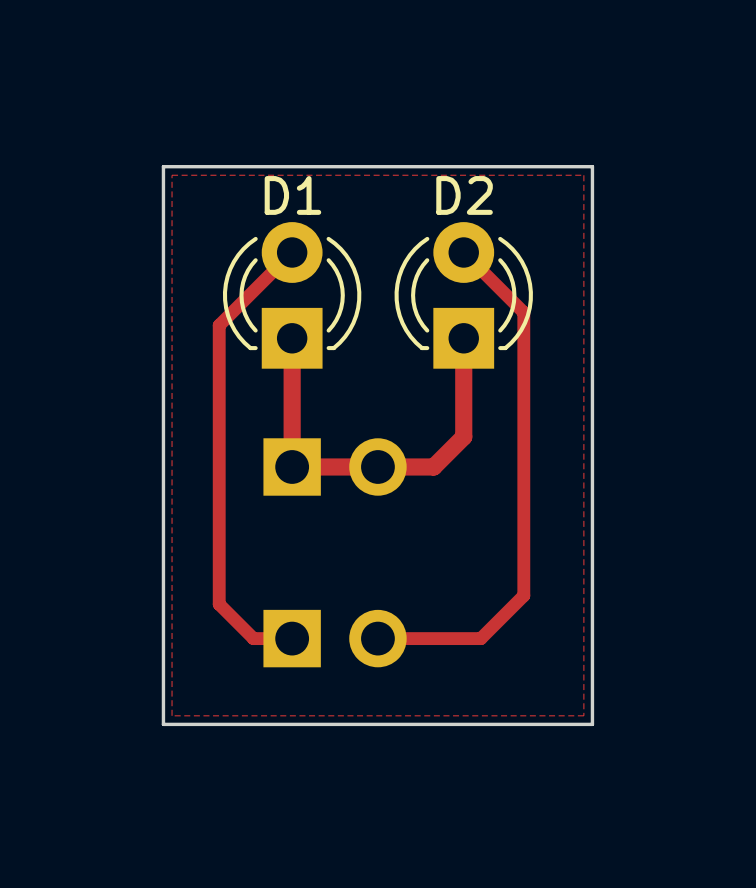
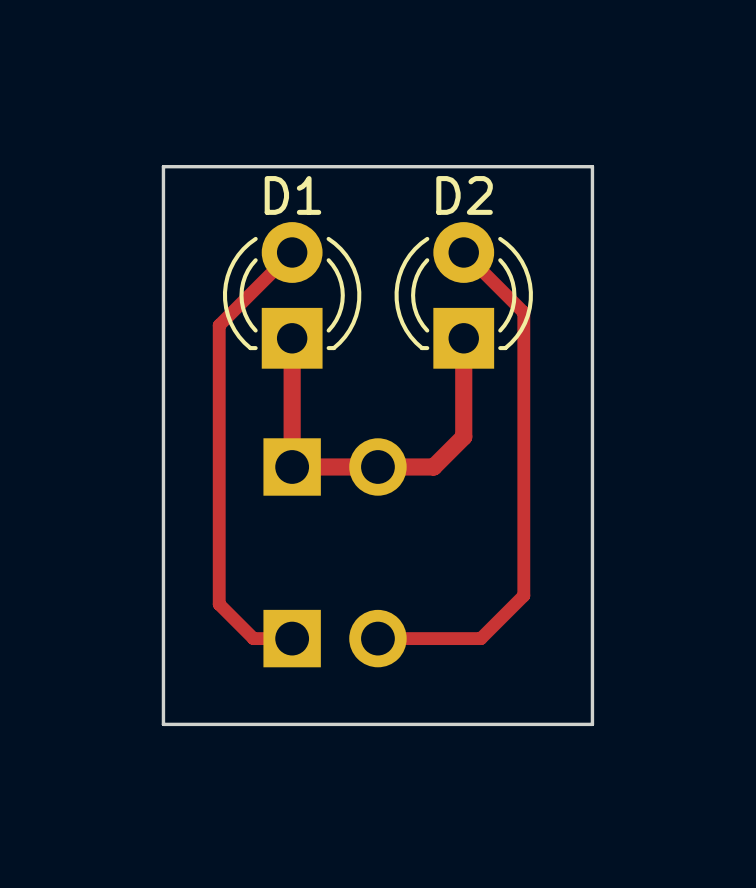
top zone outline: (172, 175) (583, 175) (583, 715) (172, 715) (172, 175) -> none

